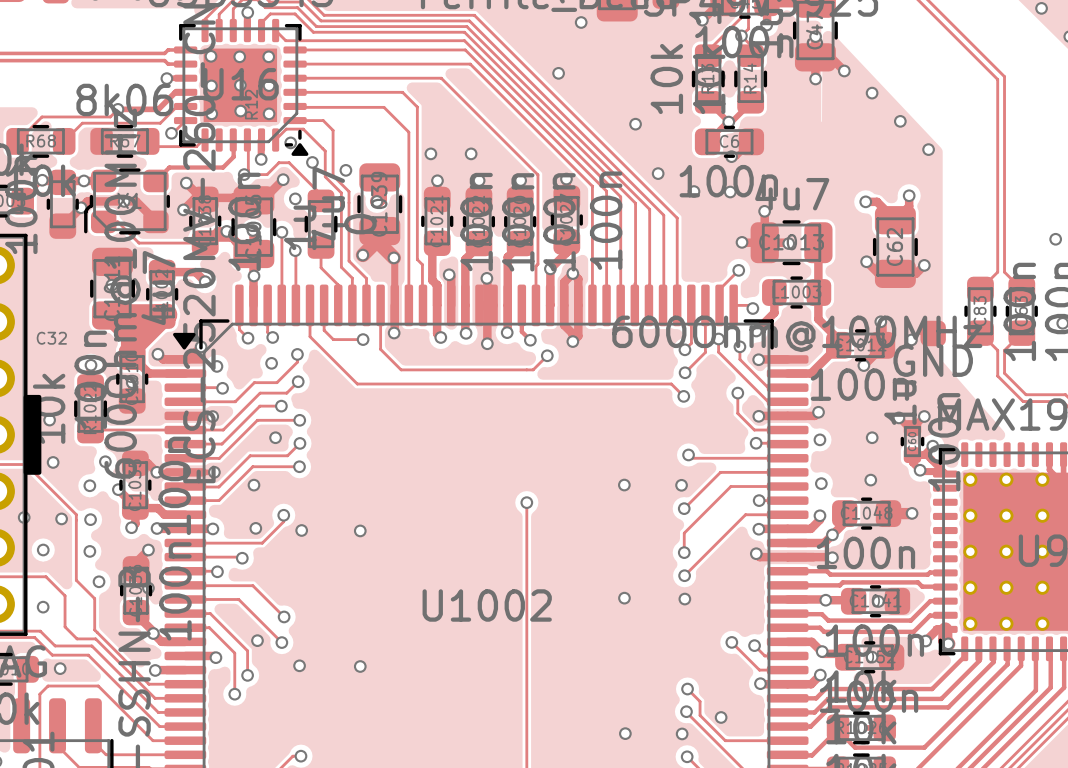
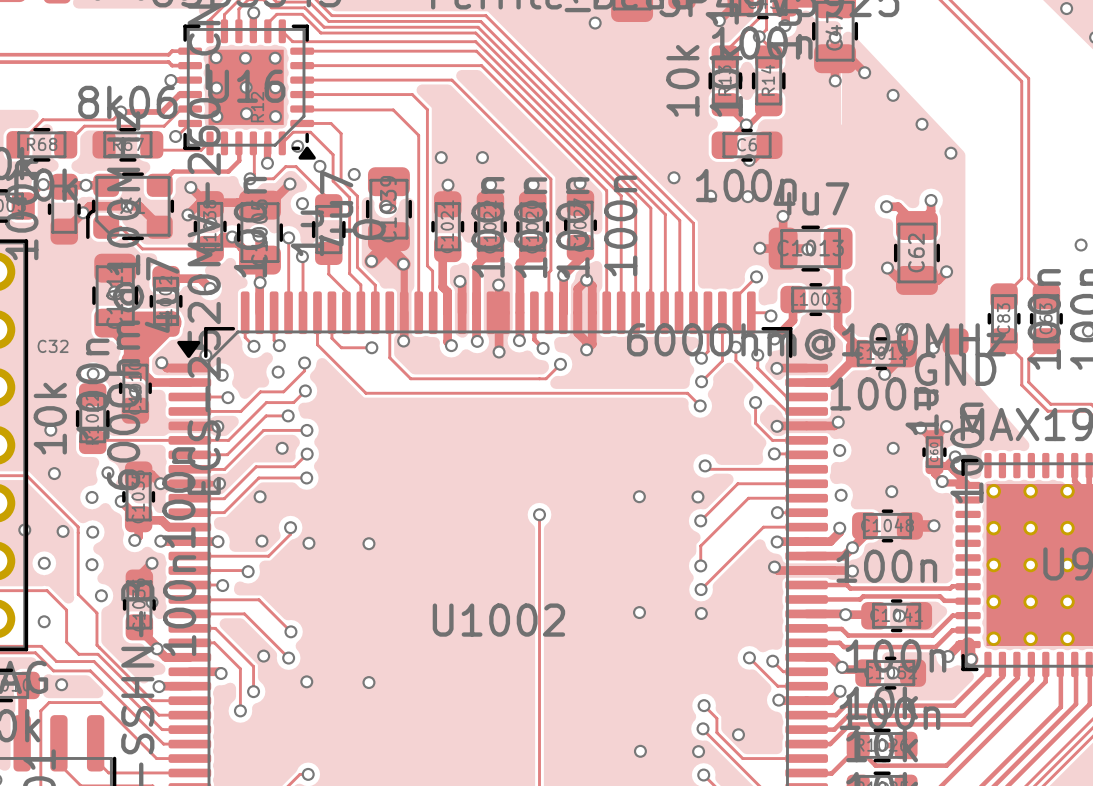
via: (558, 73) -> none
via: (635, 124) -> none
drawing: [23, 394, 42, 475] -> none

